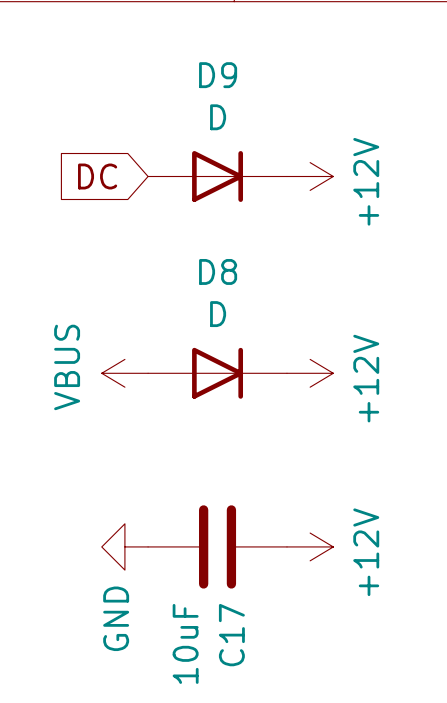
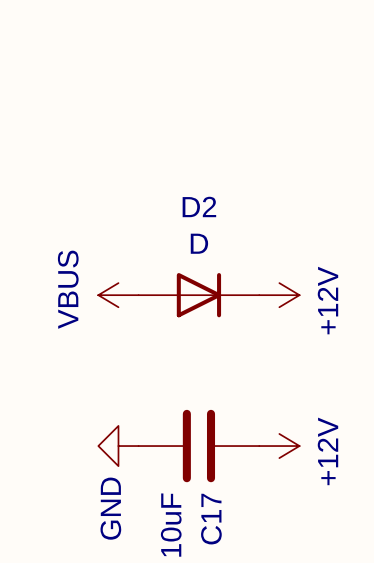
global label: DC (97, 176) -> none
D9: D (217, 176) -> none
power symbol: +12V (310, 176) -> none
D8 name: D8 (218, 271) -> D2 (199, 206)

